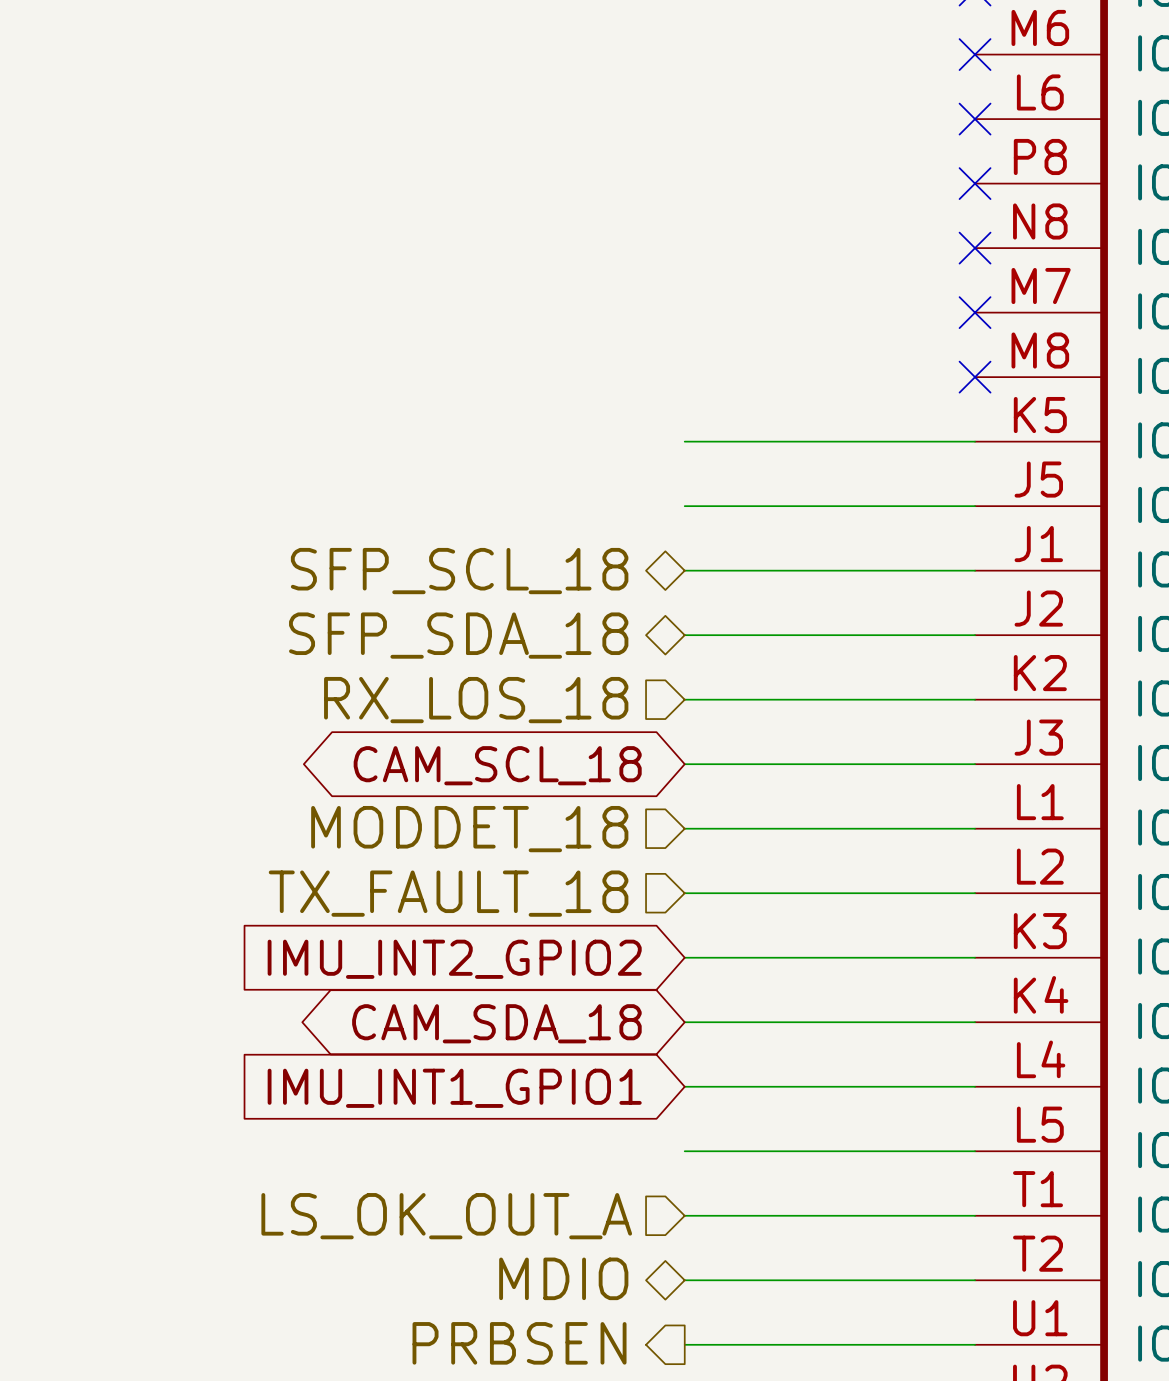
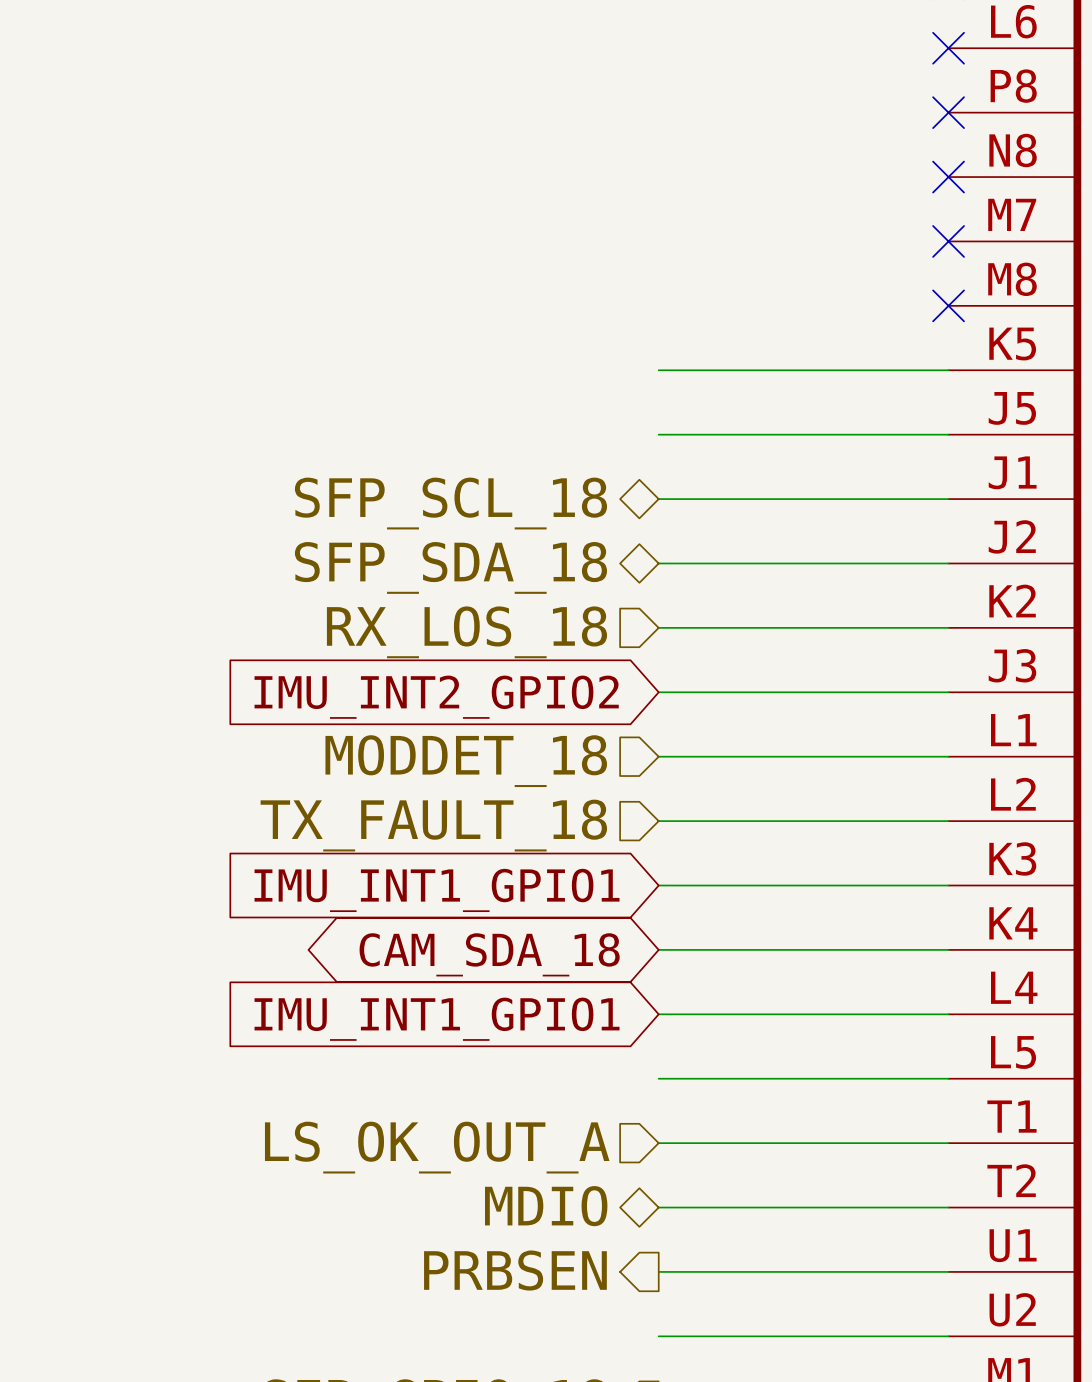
global label shape: bidirectional (497, 765) -> input (436, 697)
global label: CAM_SCL_18 (497, 765) -> IMU_INT2_GPIO2 (436, 697)
global label: IMU_INT2_GPIO2 (454, 959) -> IMU_INT1_GPIO1 (437, 890)

